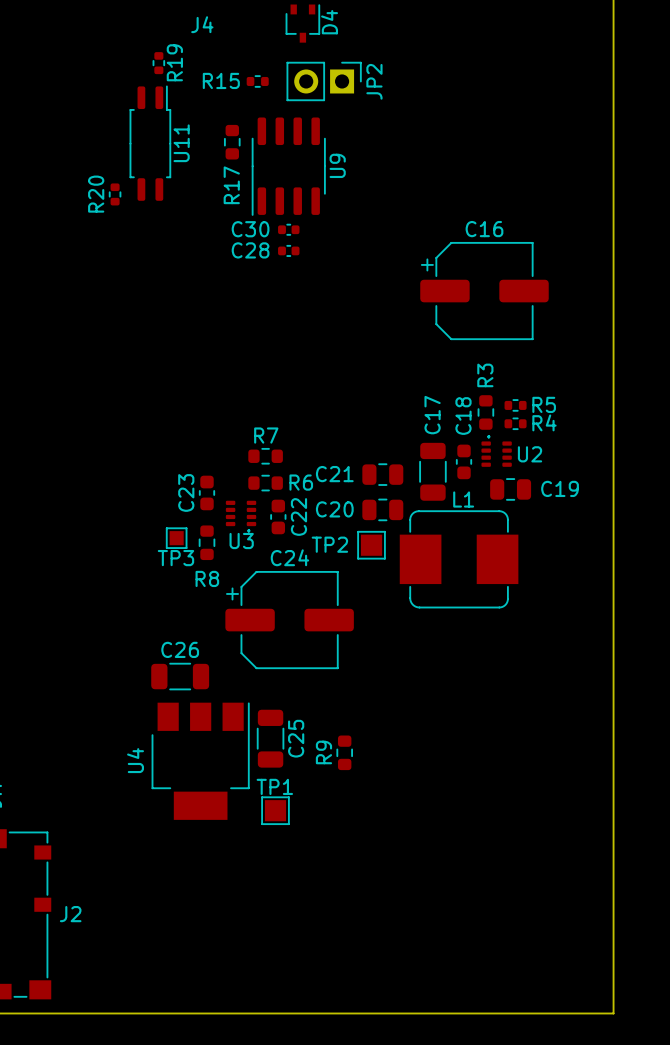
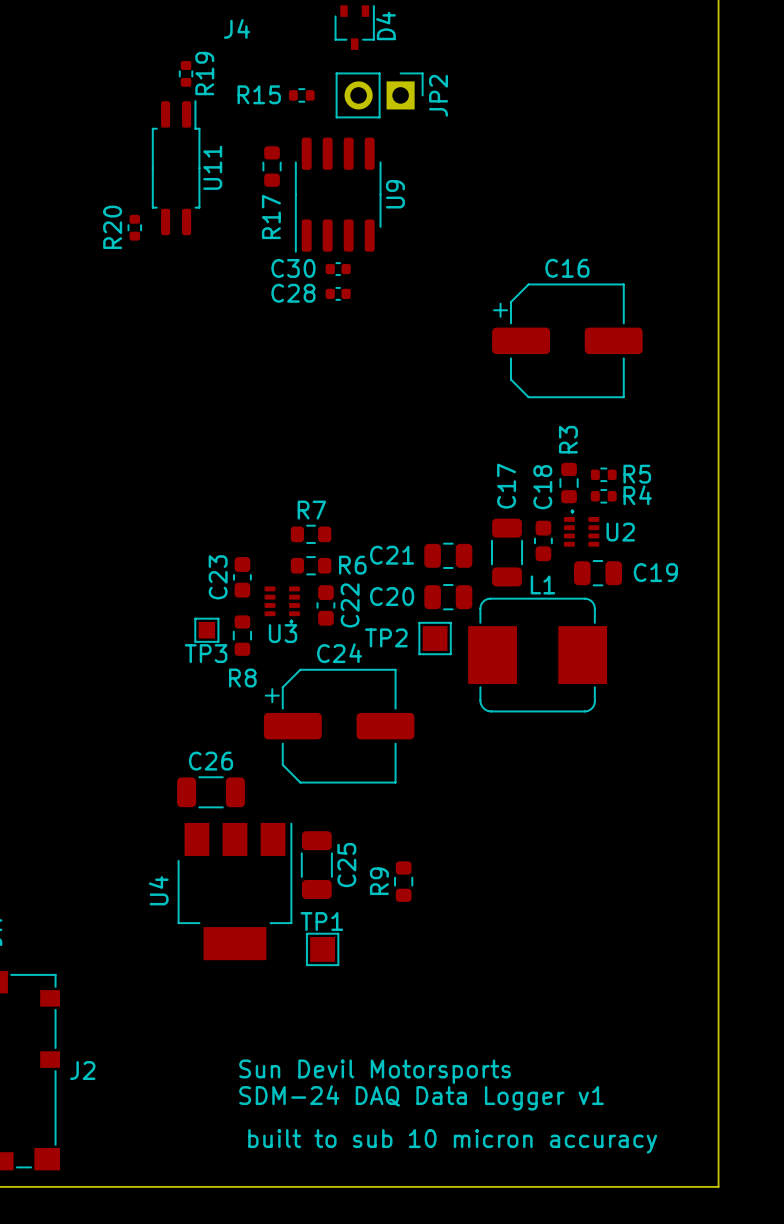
text: none -> Sun Devil Motorsports (375, 1071)
text: none -> SDM-24 DAQ Data Logger v1 (421, 1097)
text: none -> built to sub 10 micron accuracy (452, 1141)

